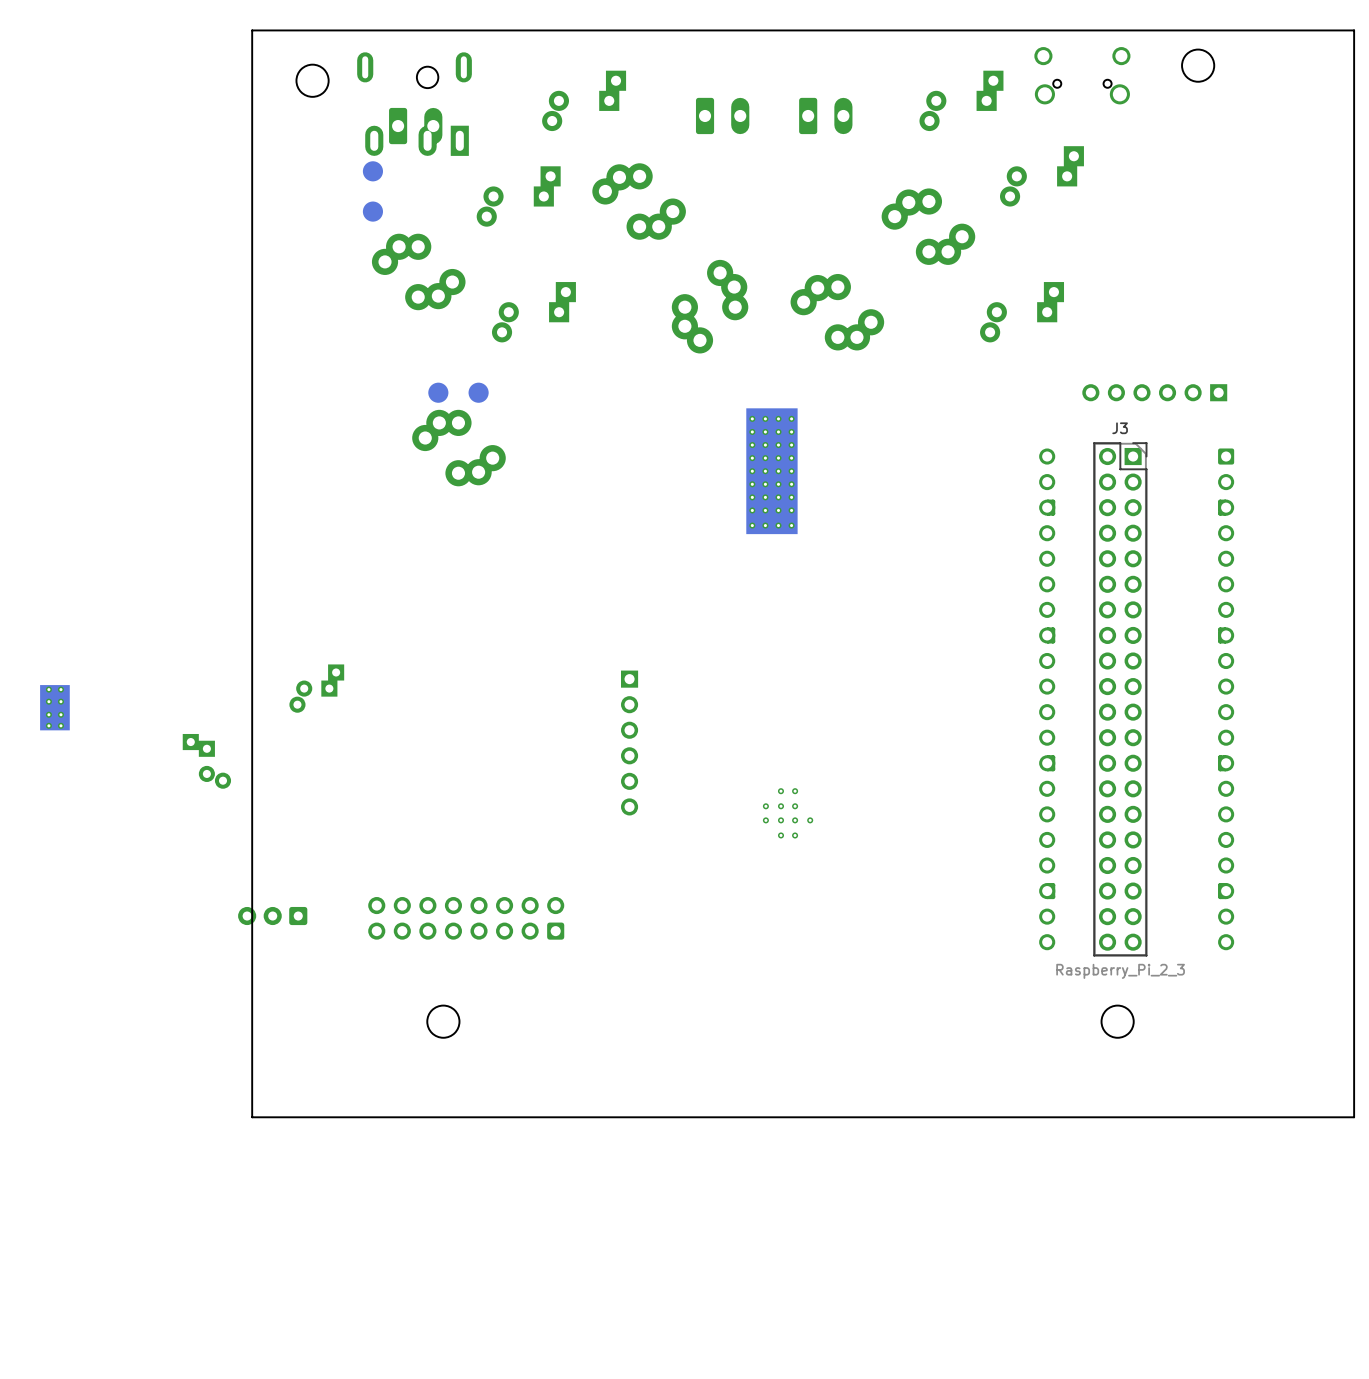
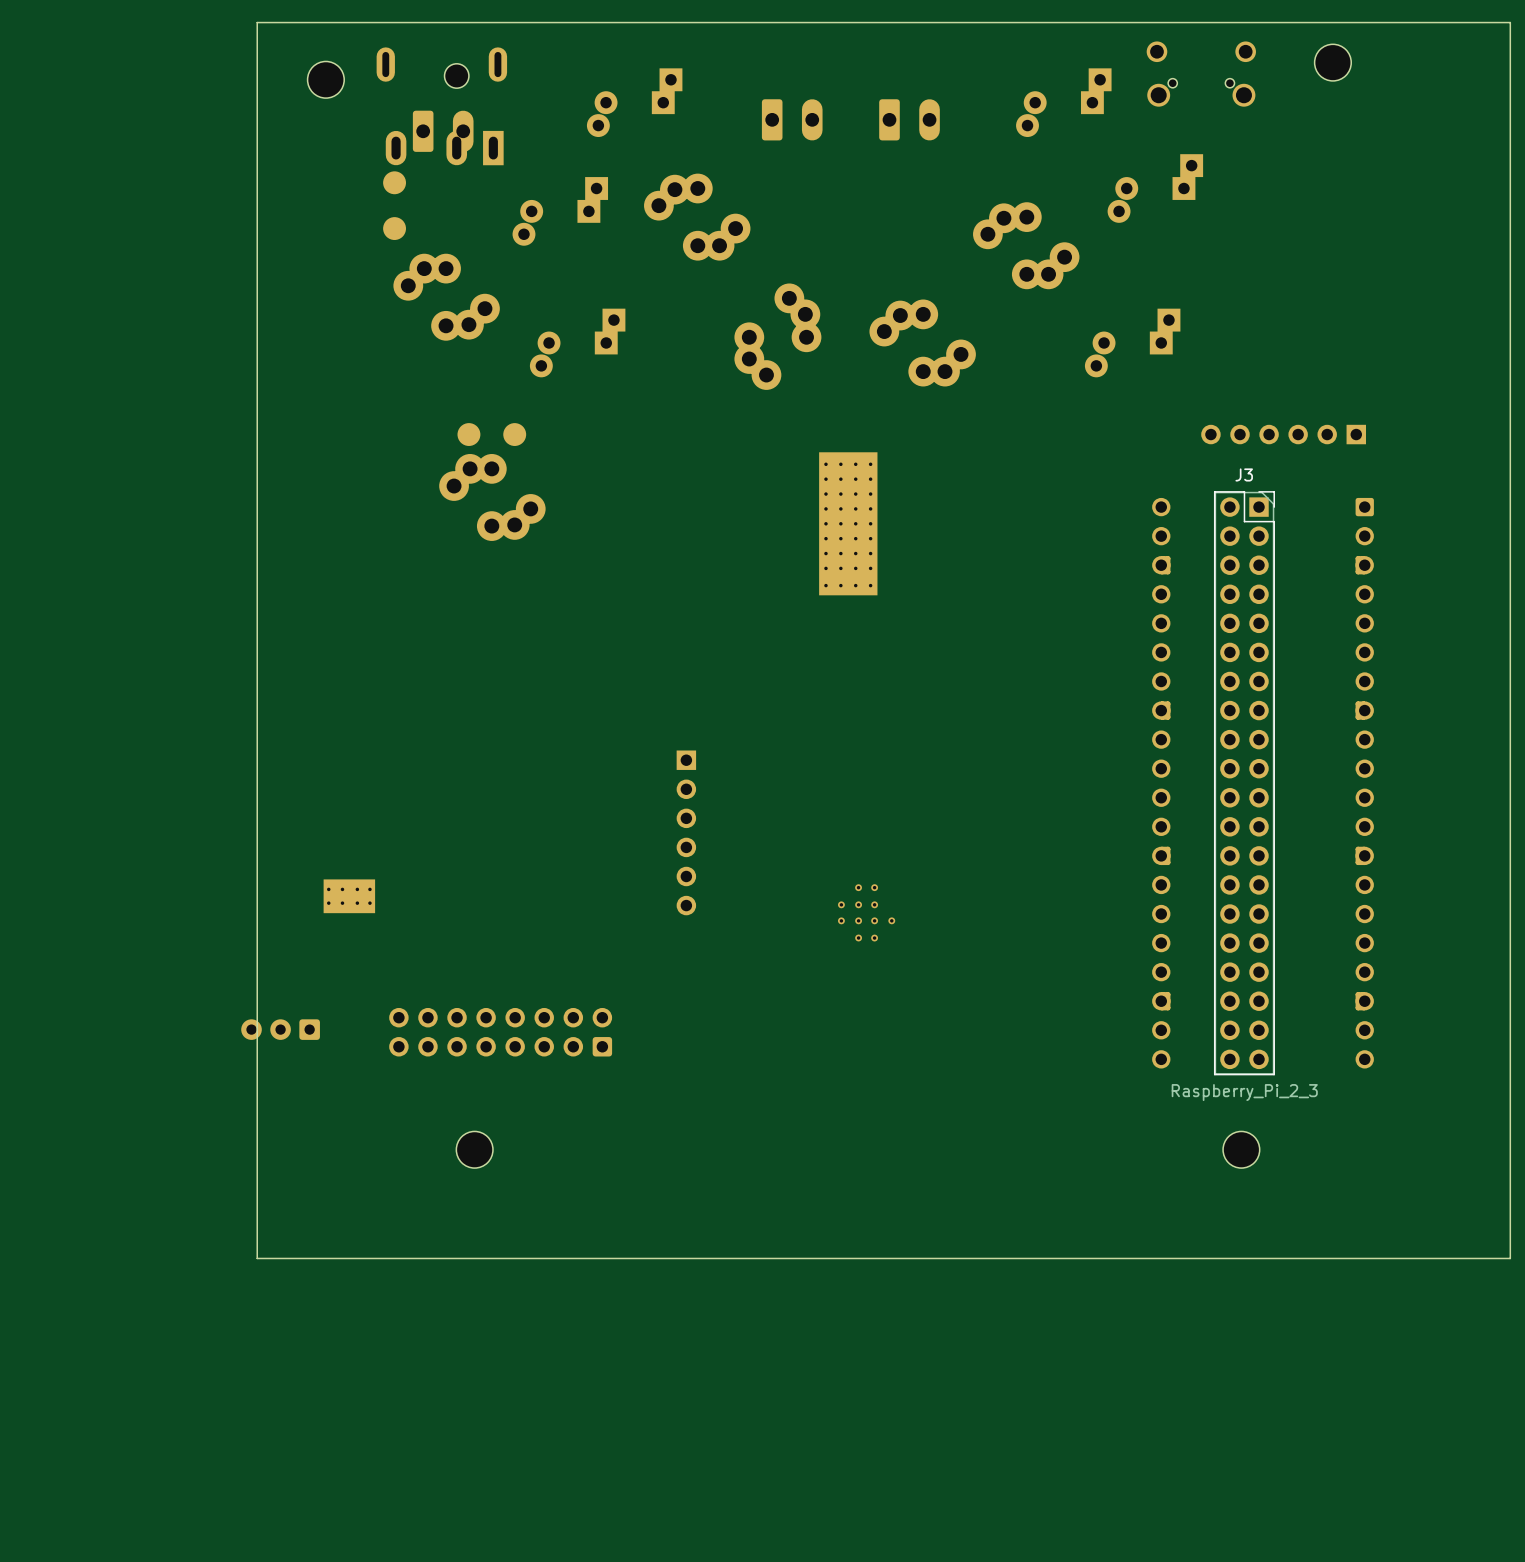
part: (316, 688) -> none
part: (54, 707) -> none
part: (206, 761) -> none
part: none -> (349, 896)

